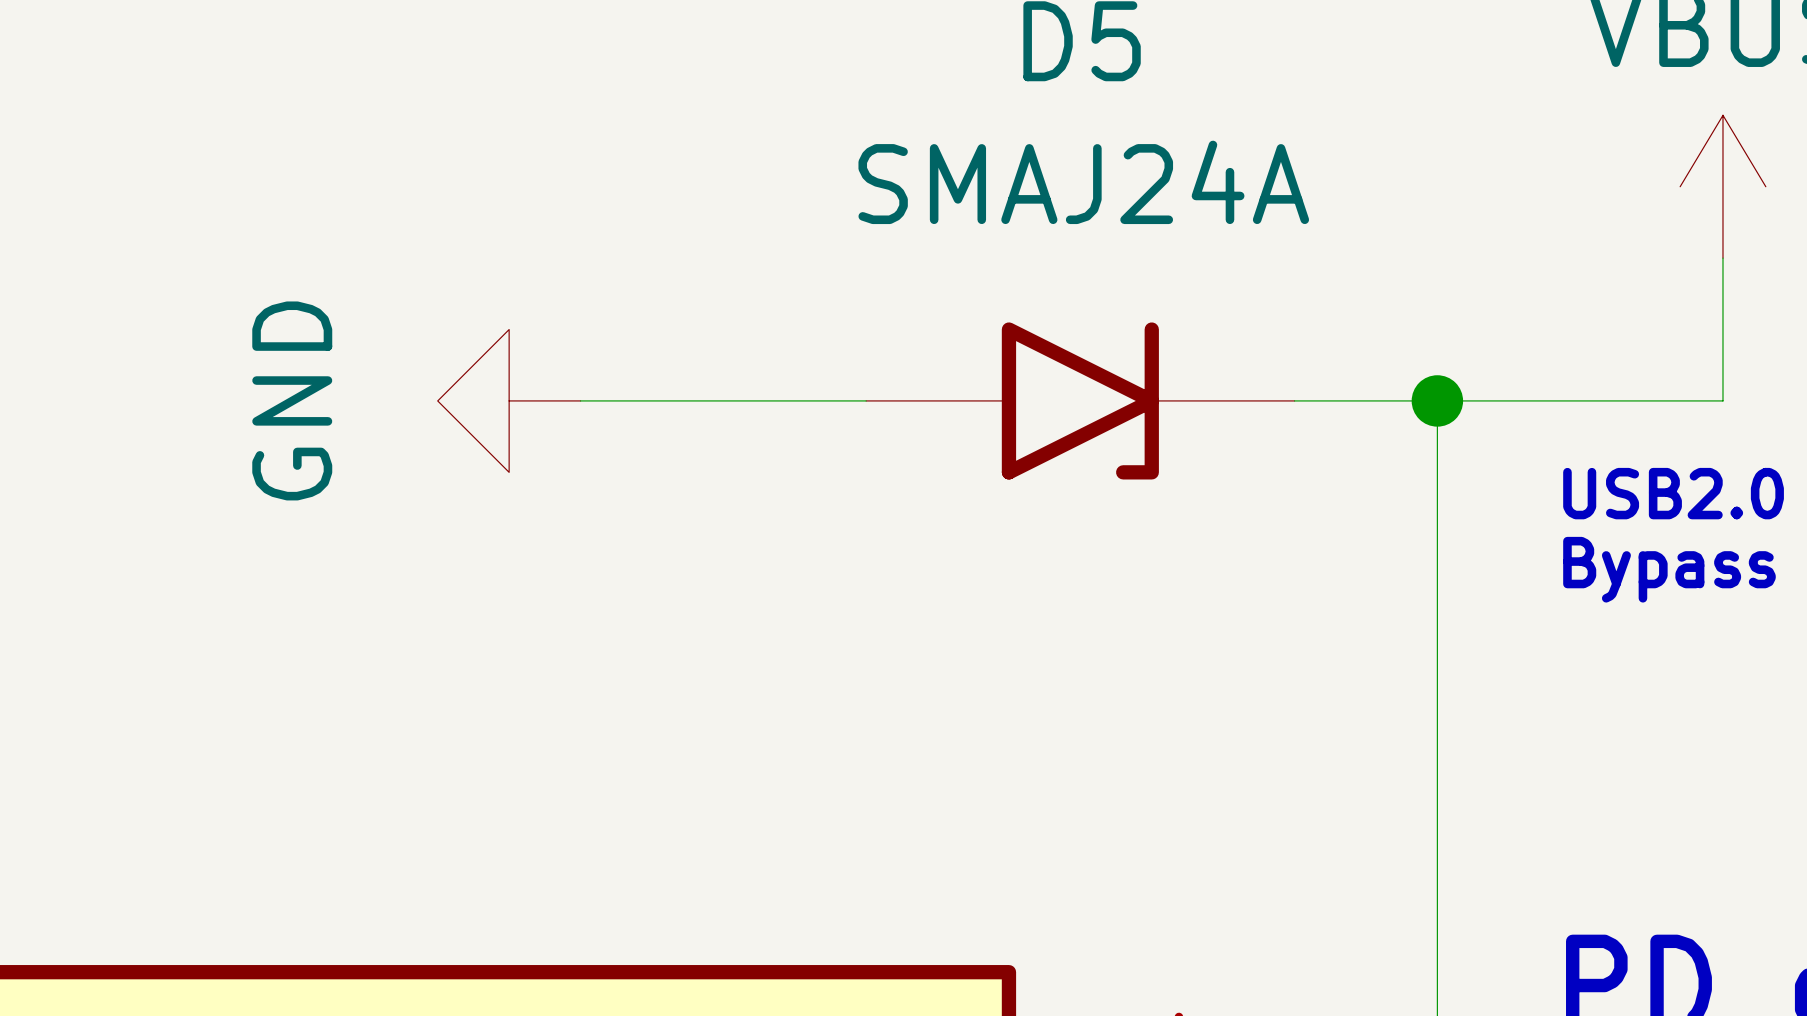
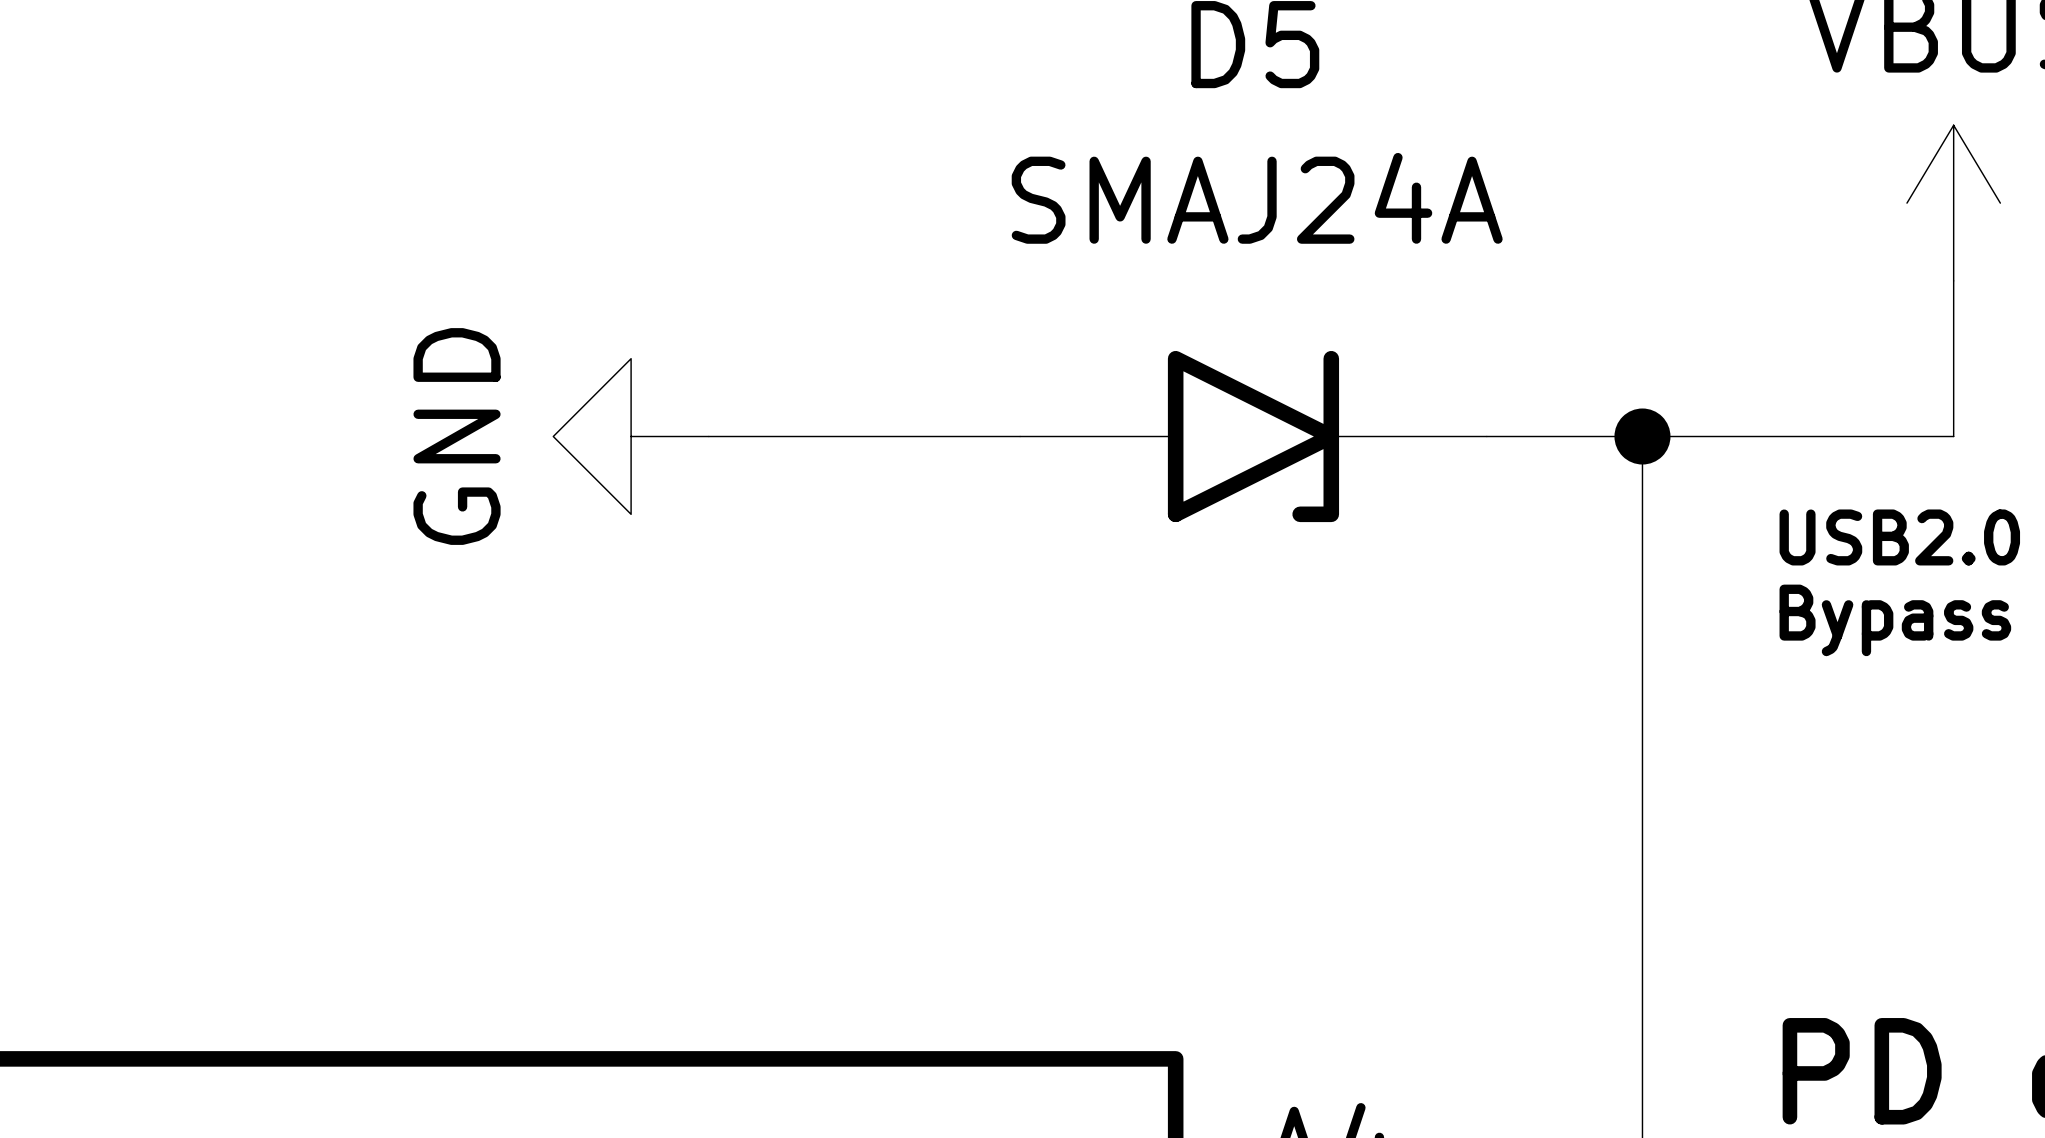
power symbol text position: GND (292, 400) -> GND (457, 436)

